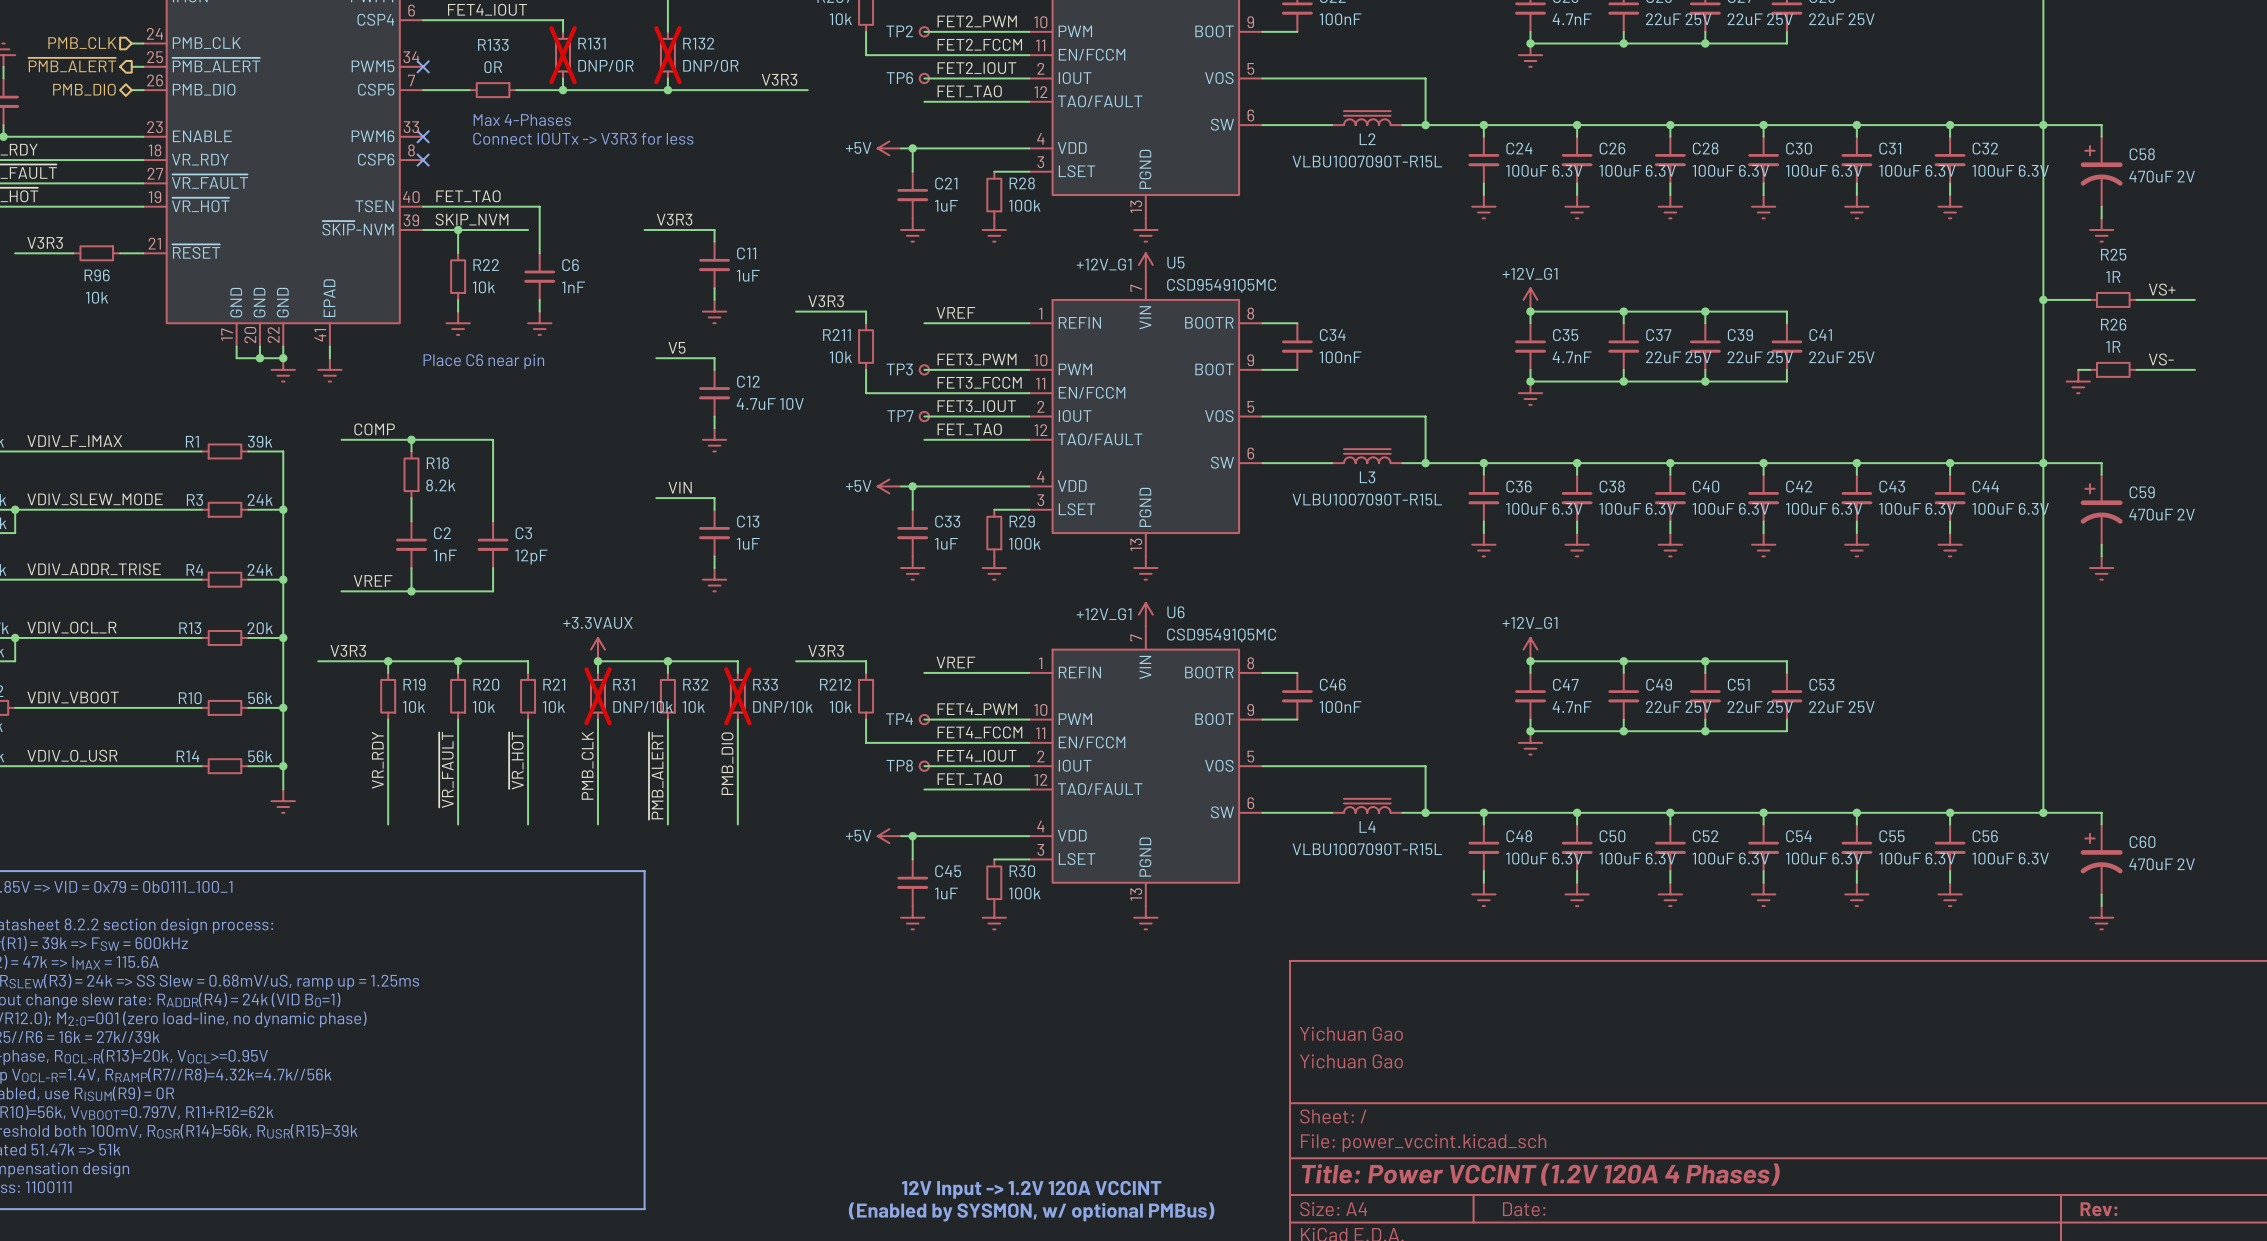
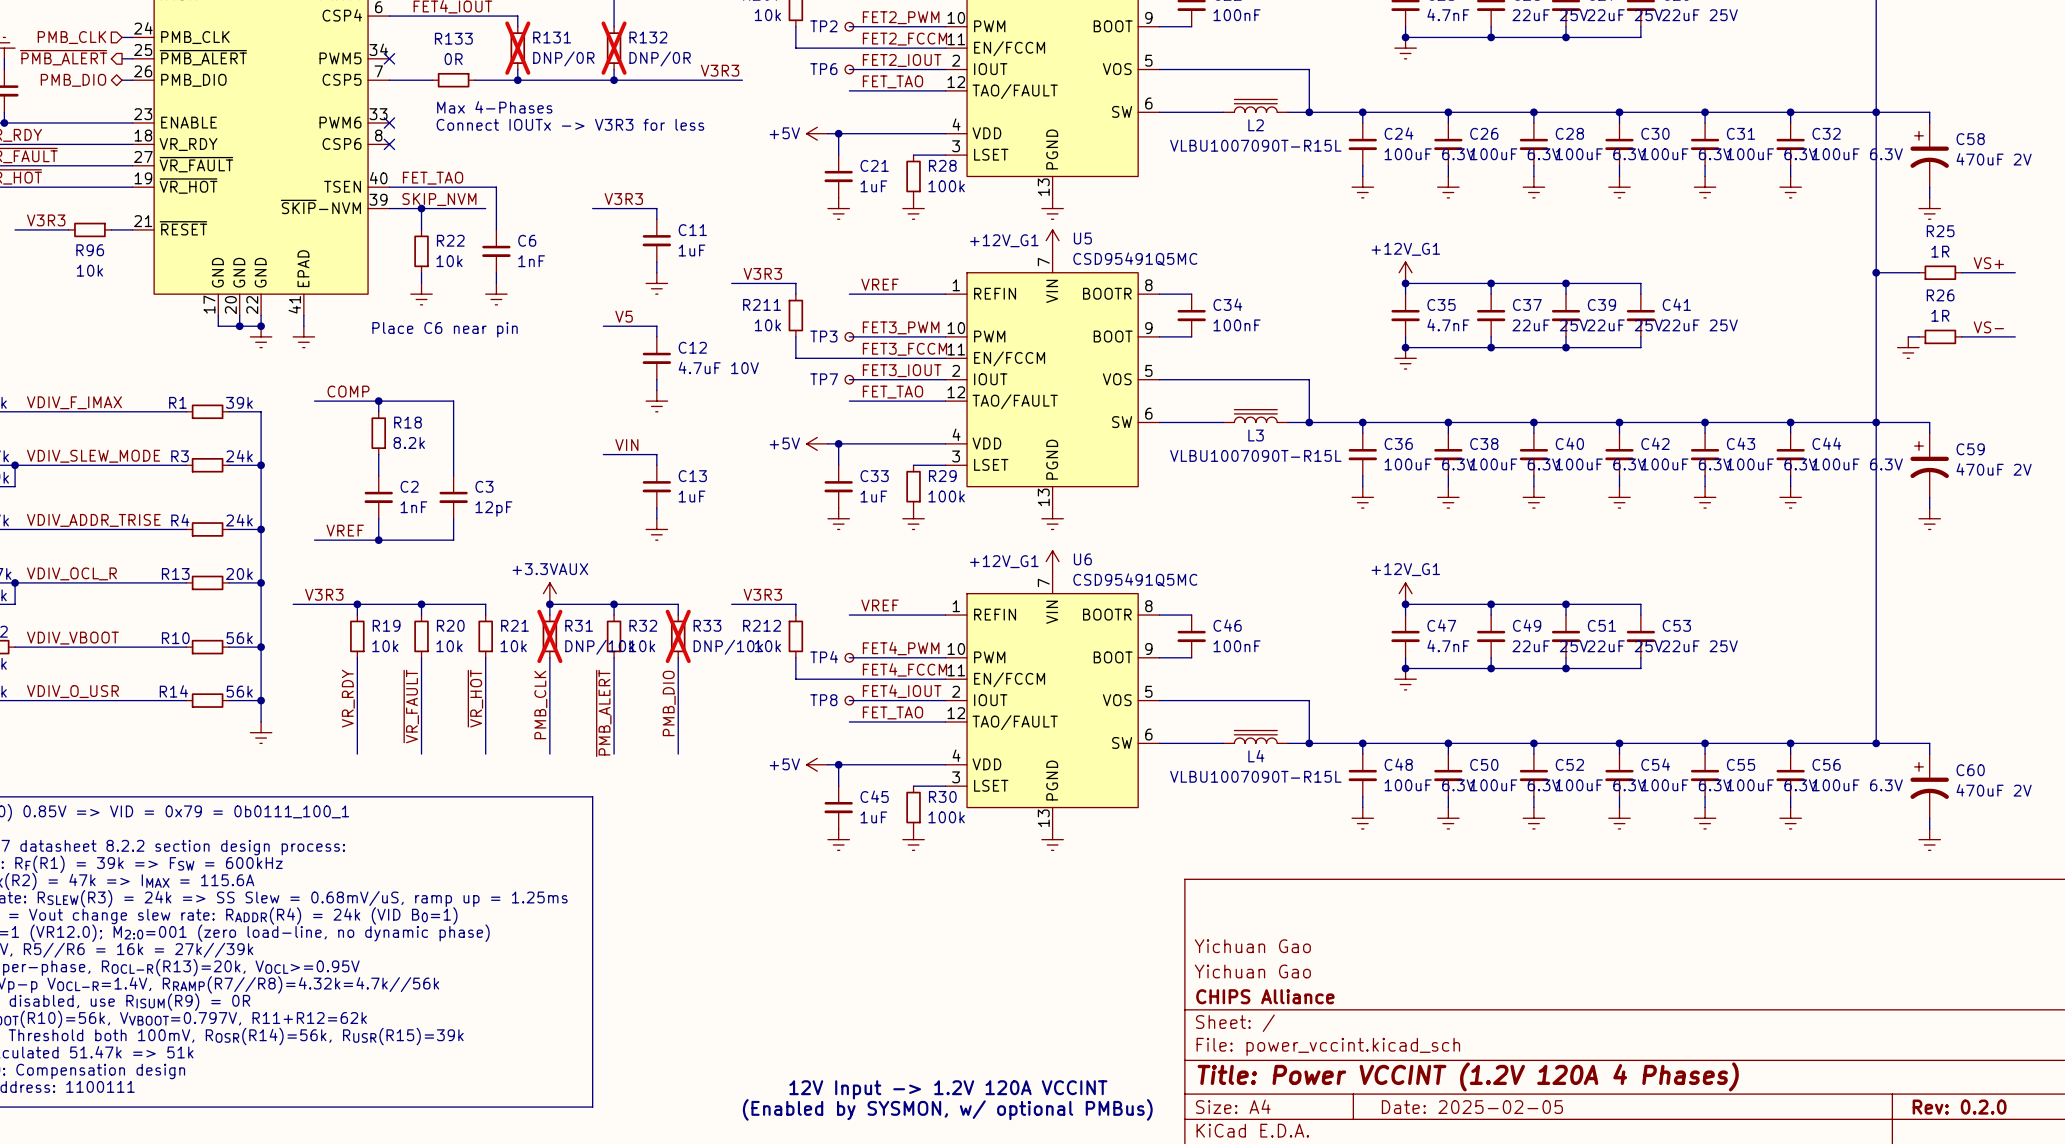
title block: none -> CHIPS Alliance (1265, 996)
title block: Date: (1524, 1209) -> Date: 2025-02-05 (1472, 1107)
title block: Rev: (2099, 1209) -> Rev: 0.2.0 (1959, 1107)

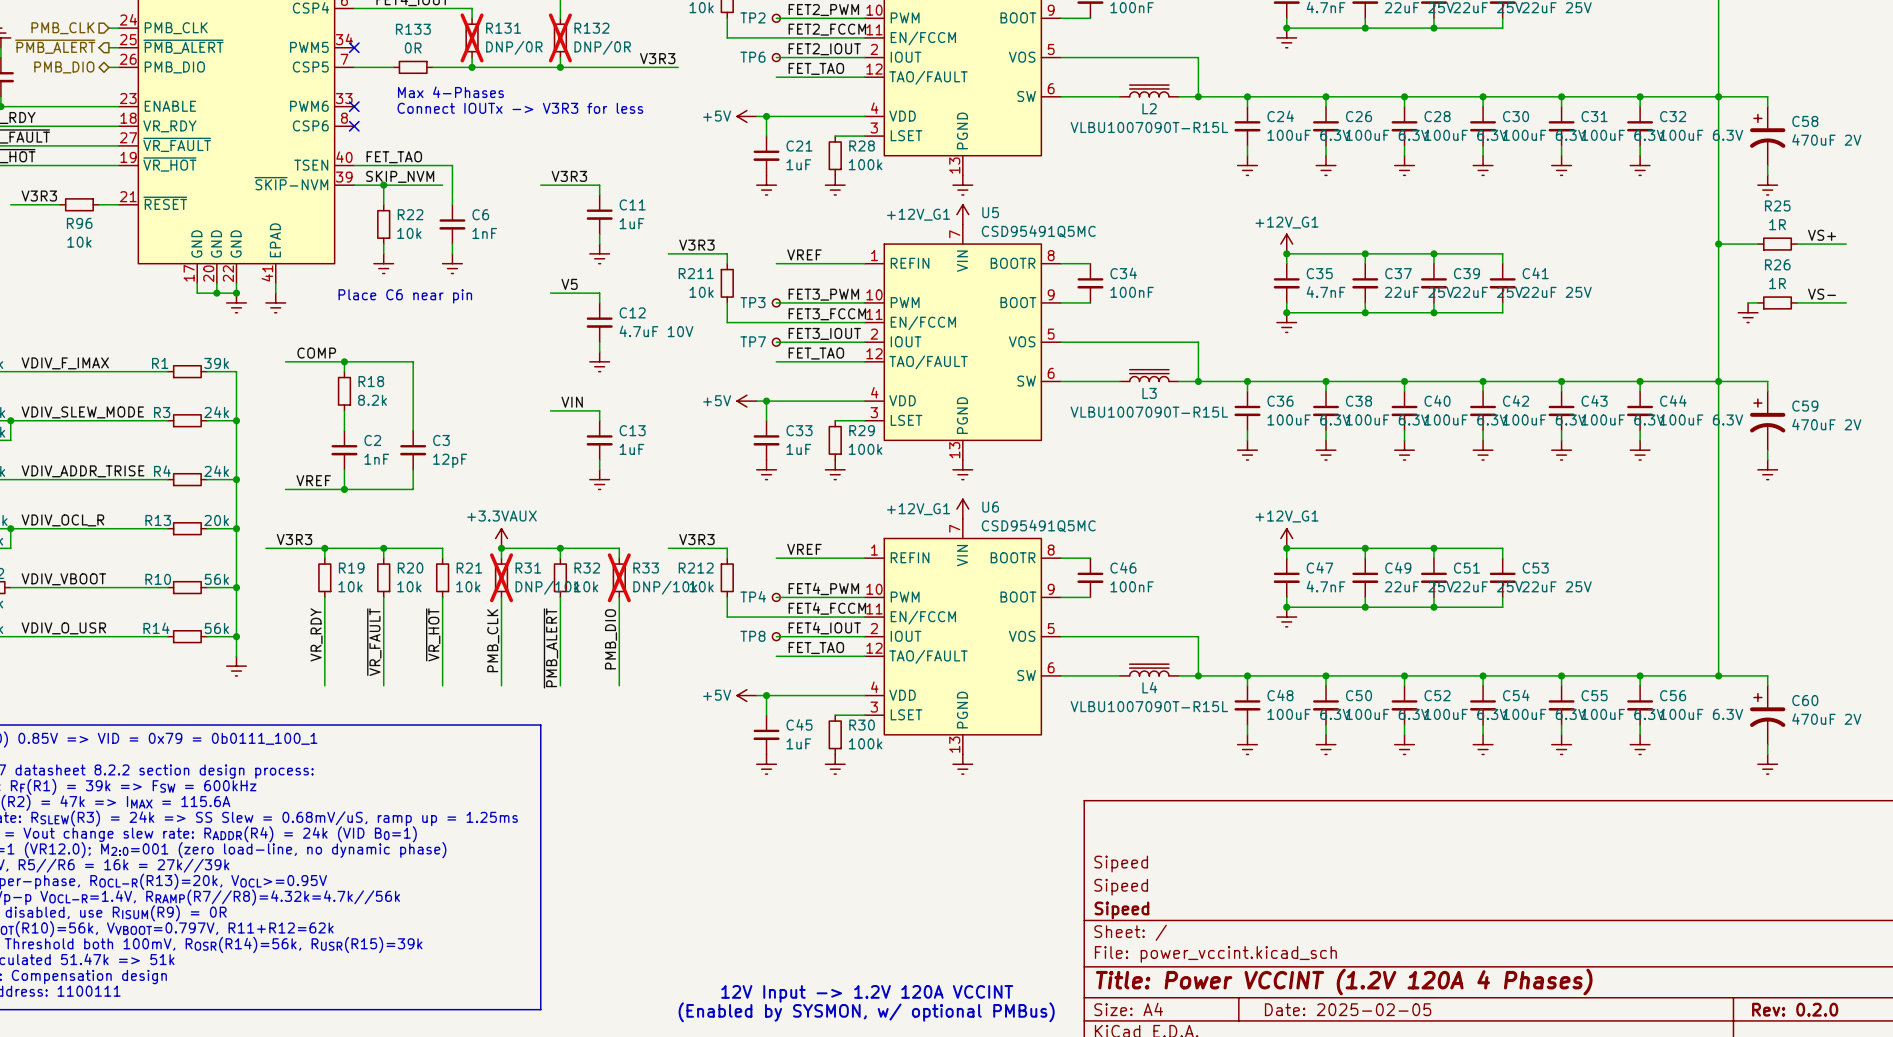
title block: Yichuan Gao (1252, 946) -> Sipeed (1121, 864)
title block: Yichuan Gao (1252, 971) -> Sipeed (1121, 887)
title block: CHIPS Alliance (1265, 996) -> Sipeed (1121, 910)

